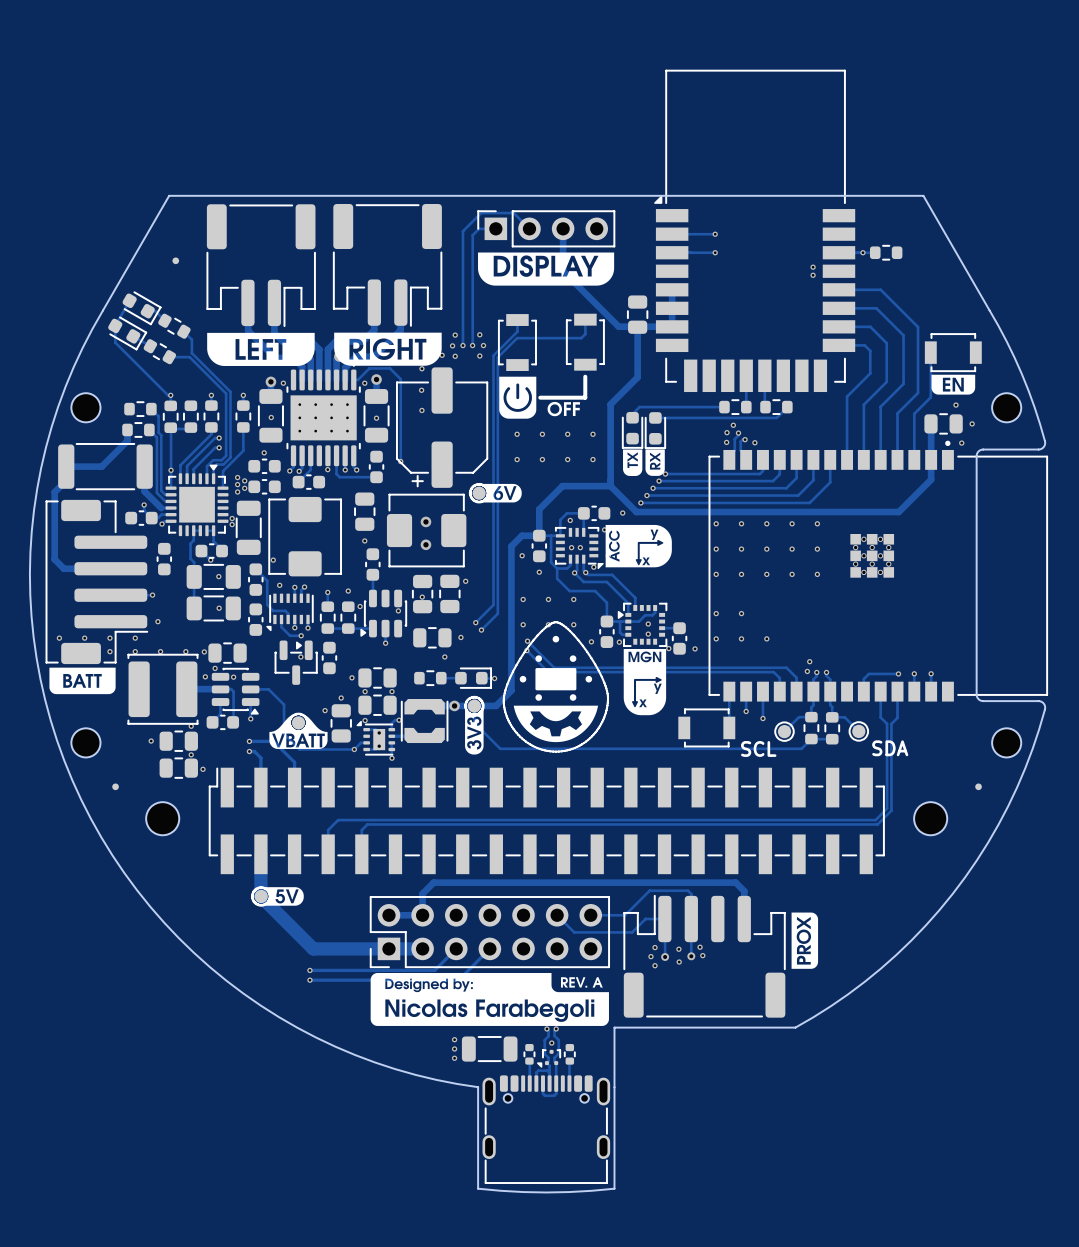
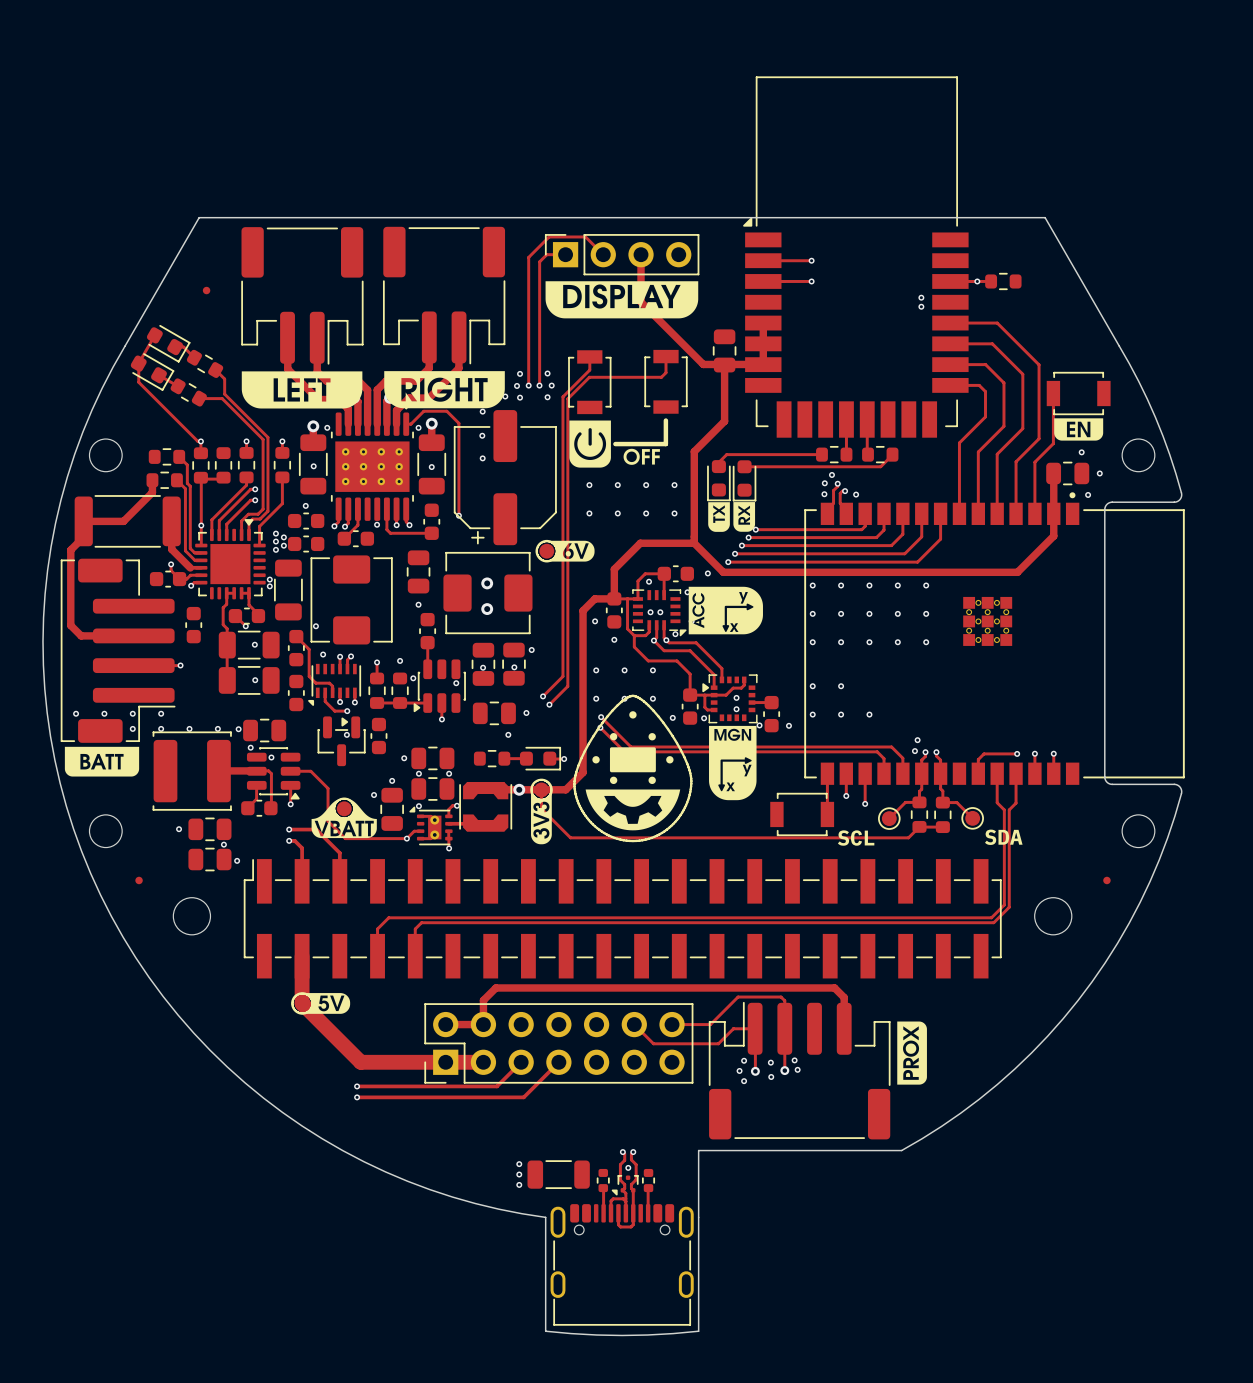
via: none -> (514, 667)
via: (157, 621) -> none
via: (205, 676) -> none
via: (191, 726) -> none
drawing: [370, 972, 609, 1026] -> none

